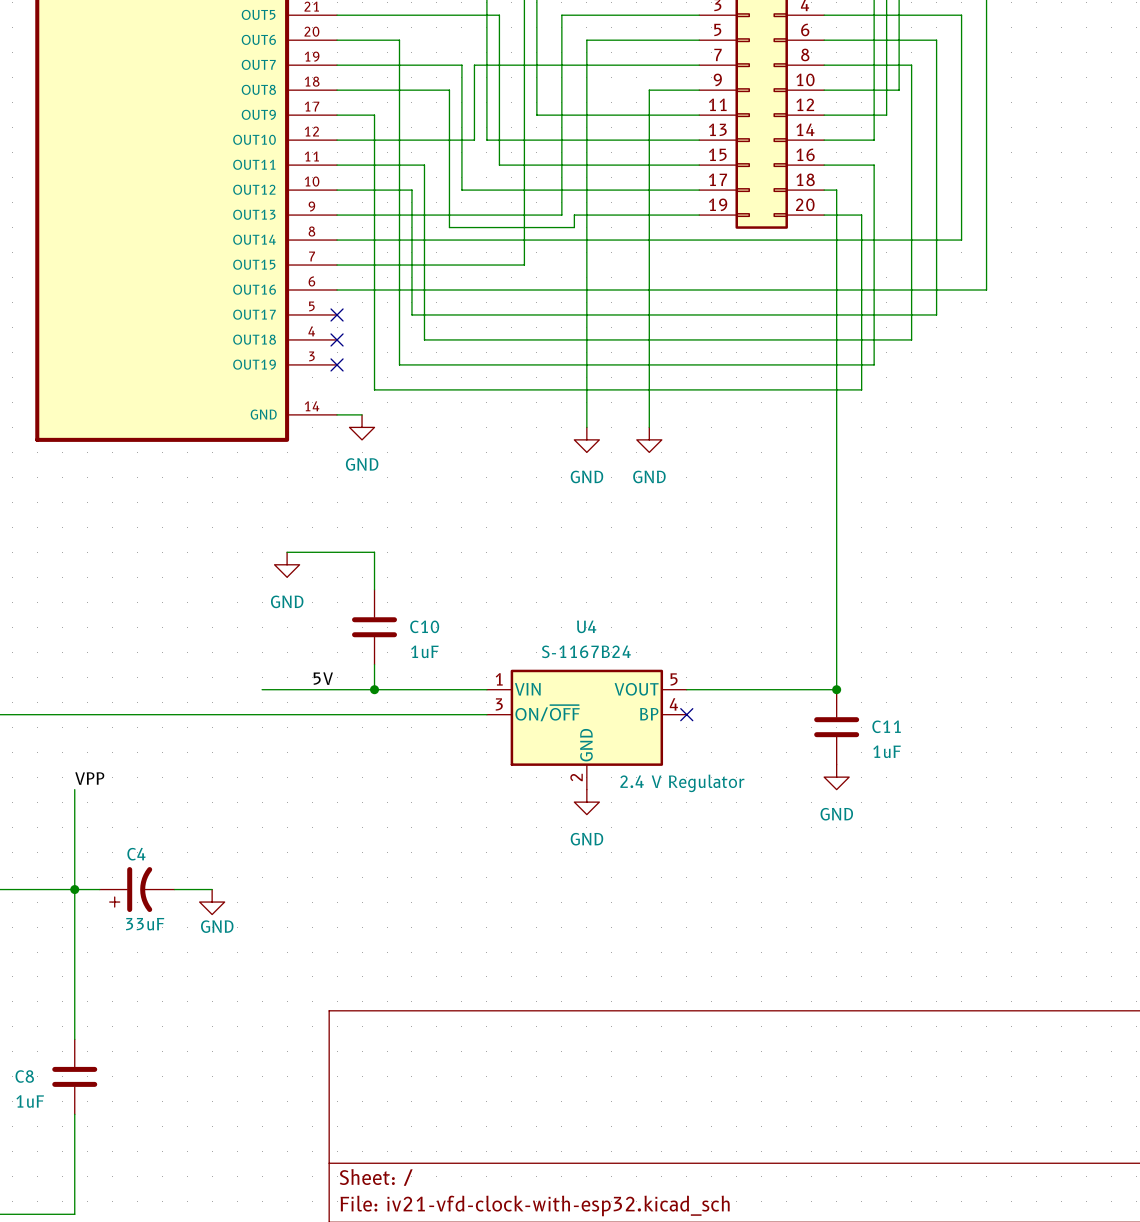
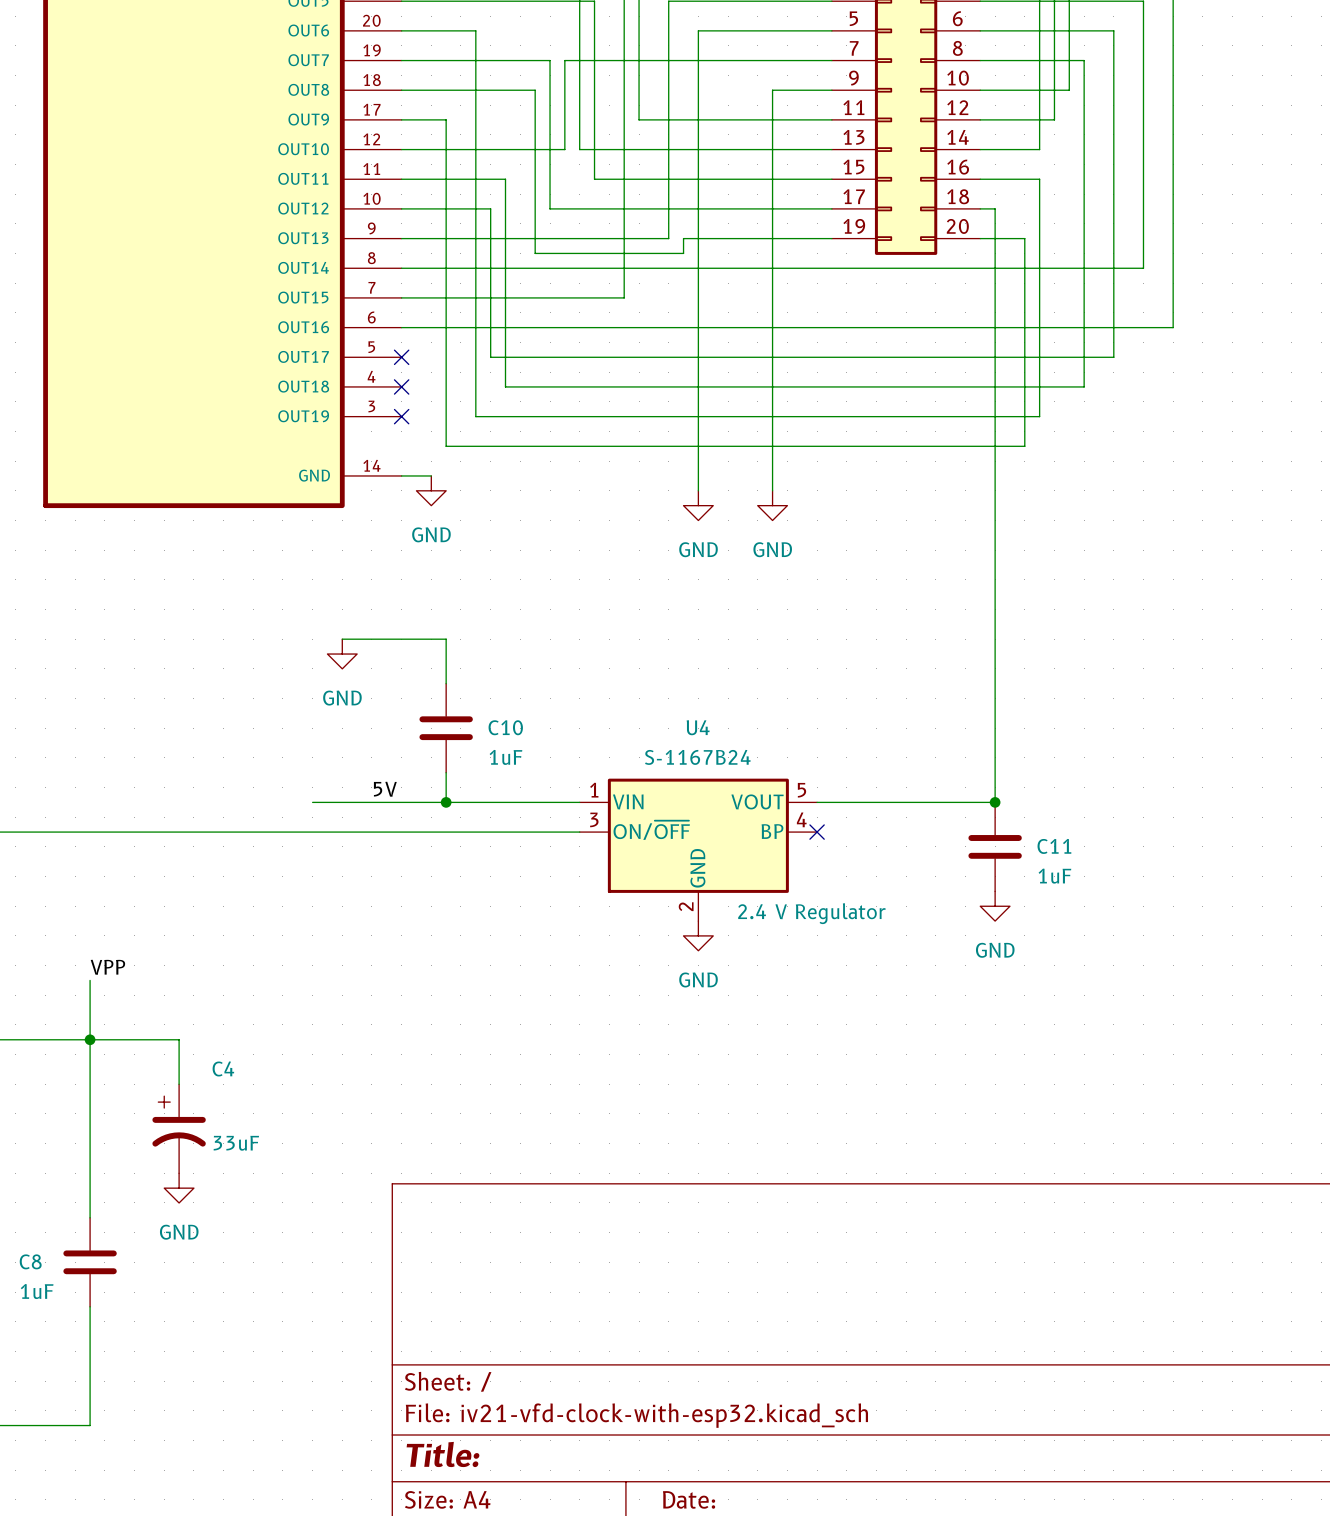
label position: VPP (89, 778) -> VPP (107, 967)
wire: (74, 789) (74, 839) -> none
C4 name position: C4 (136, 854) -> C4 (223, 1068)
wire: none -> (119, 1039) (179, 1039) (179, 1084)
C4 rotation: 0° (130, 889) -> 90° clockwise (179, 1121)
C4 position: (137, 889) -> (179, 1128)
wire: (174, 889) (212, 889) -> none
power symbol position: GND (212, 902) -> GND (179, 1188)
C4 value position: 33uF (145, 924) -> 33uF (236, 1143)
power symbol text position: GND (217, 926) -> GND (179, 1232)

